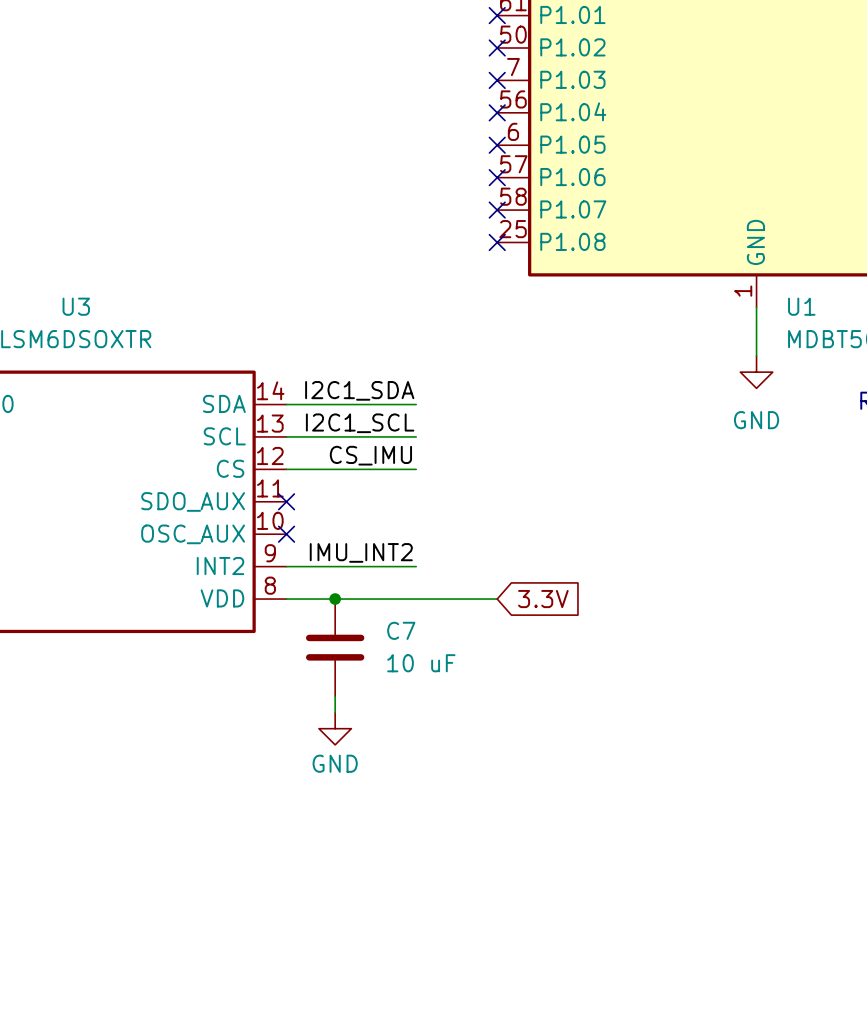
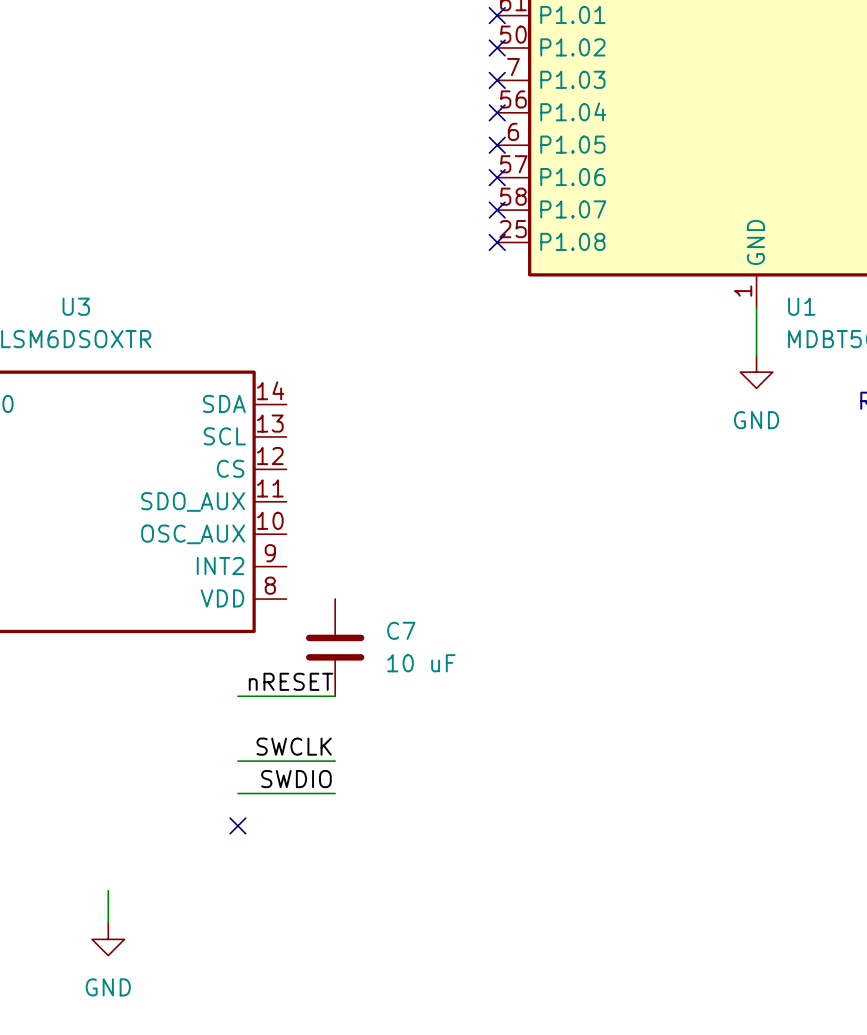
label: I2C1_SDA (359, 390) -> none
wire: (286, 404) (416, 404) -> none
label: I2C1_SCL (360, 423) -> none
wire: (286, 436) (416, 436) -> none
label: CS_IMU (370, 455) -> none
wire: (286, 469) (416, 469) -> none
no-connect mark: (286, 501) -> none
no-connect mark: (286, 534) -> none
label: IMU_INT2 (361, 552) -> none
wire: (286, 566) (416, 566) -> none
wire: (286, 599) (497, 599) -> none
junction: (335, 599) -> none
global label: 3.3V (543, 599) -> none
label: none -> nRESET (291, 681)
wire: (335, 696) (335, 712) -> (335, 696) (237, 696)
power symbol: GND (335, 728) -> none
label: none -> SWCLK (294, 746)
wire: none -> (237, 761) (335, 761)
label: none -> SWDIO (296, 779)
wire: none -> (237, 793) (335, 793)
no-connect mark: none -> (237, 825)
wire: none -> (108, 890) (108, 923)
power symbol: none -> GND (108, 939)

